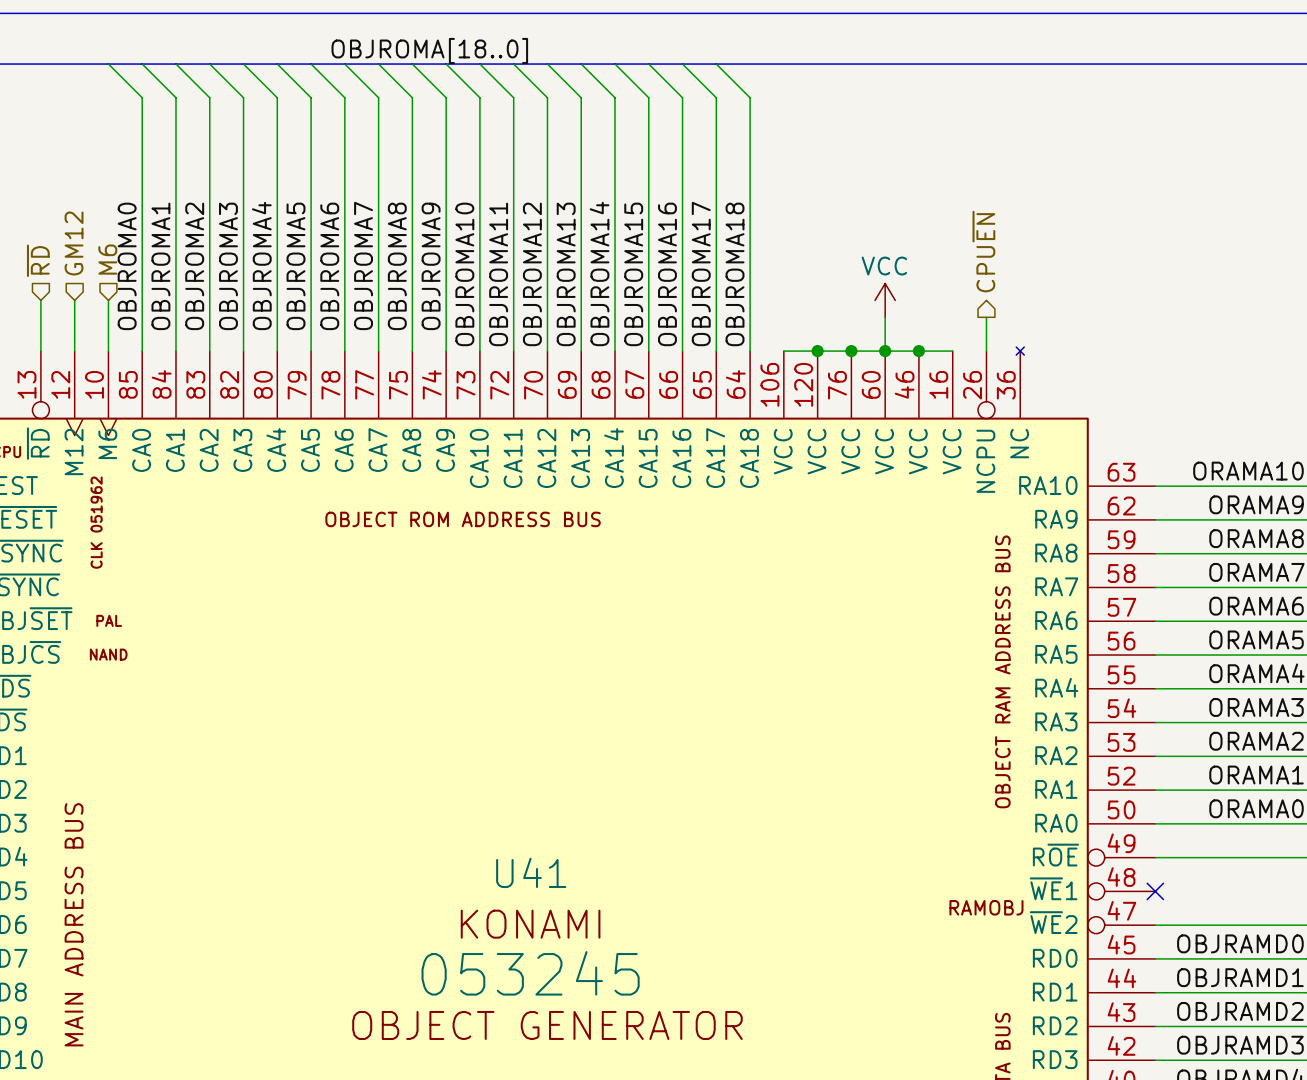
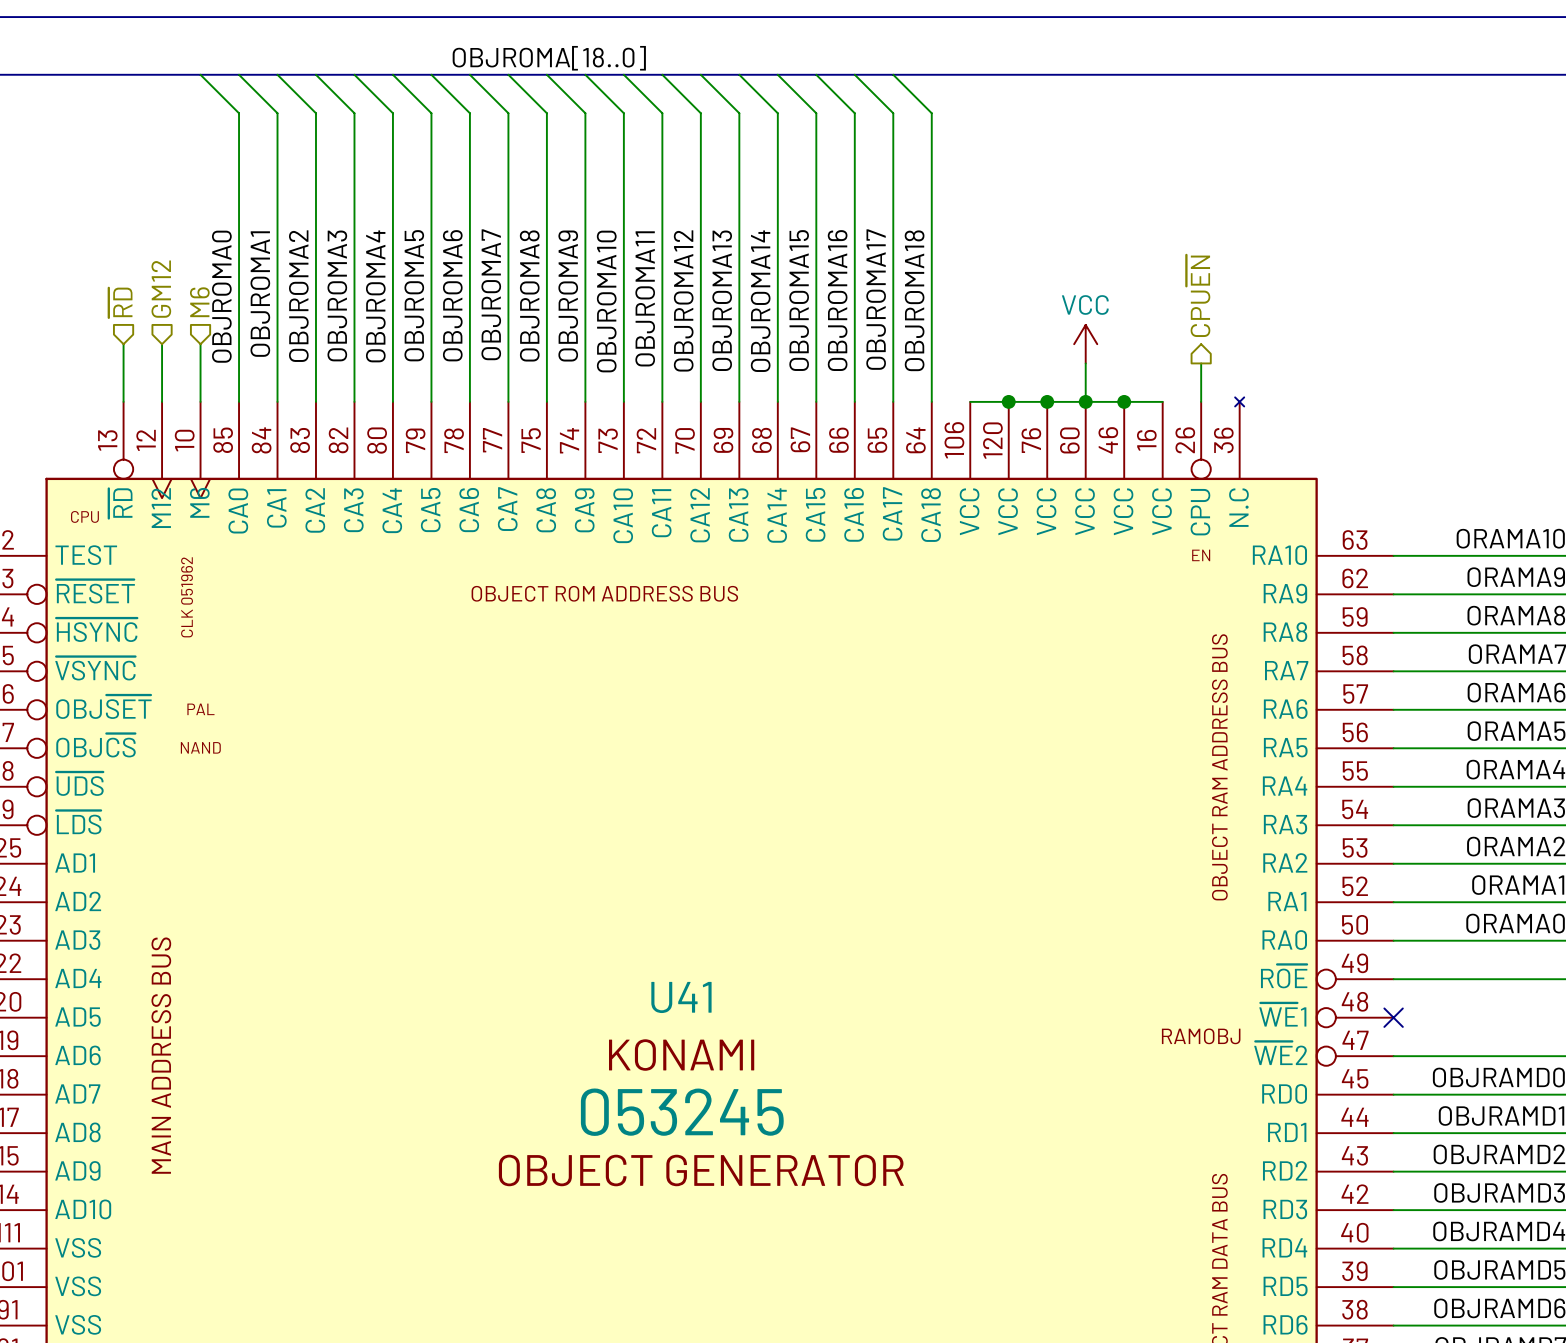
U41 pin name: NC (1019, 443) -> N.C (1238, 507)
U41 pin name: NCPU (985, 461) -> CPU (1200, 512)
U41 text: none -> EN (1201, 555)

